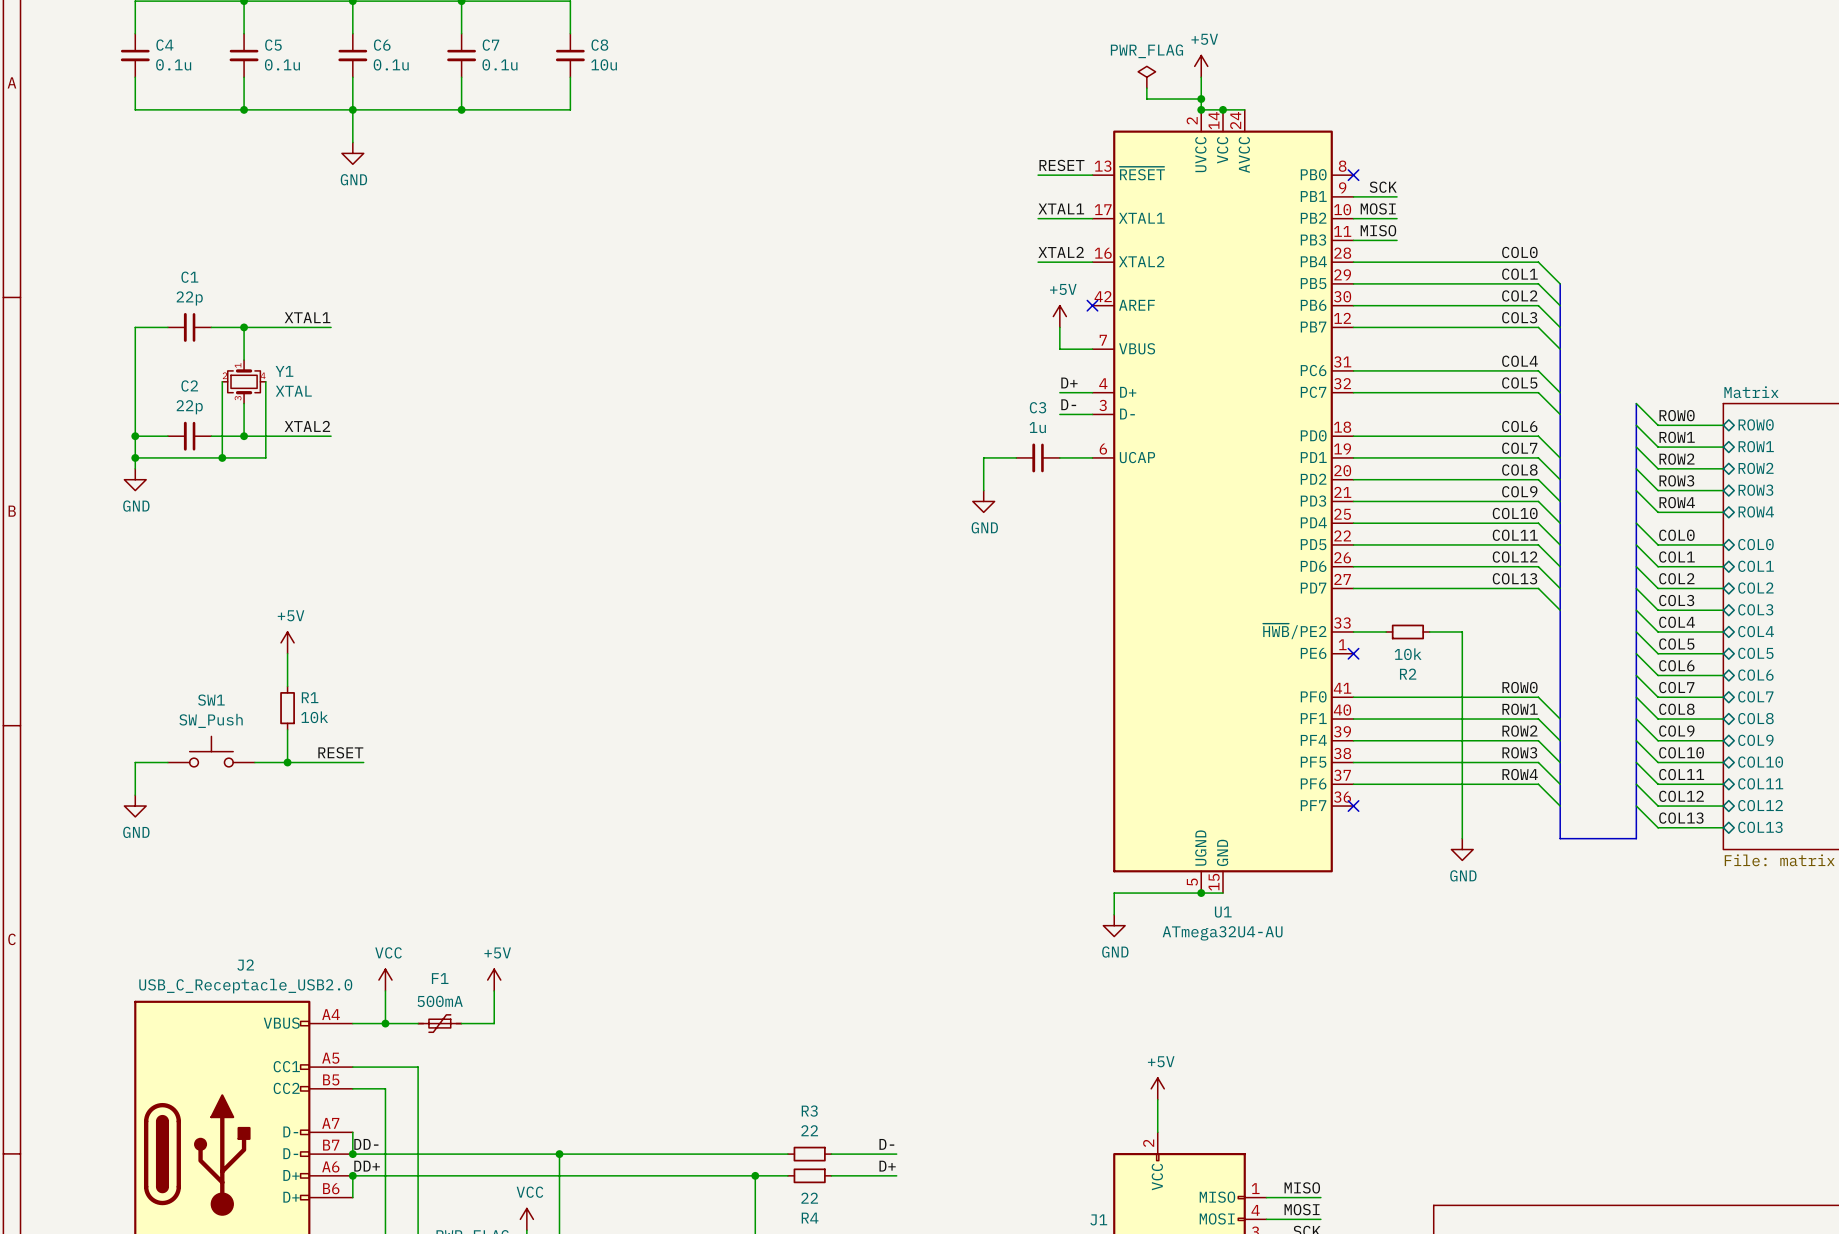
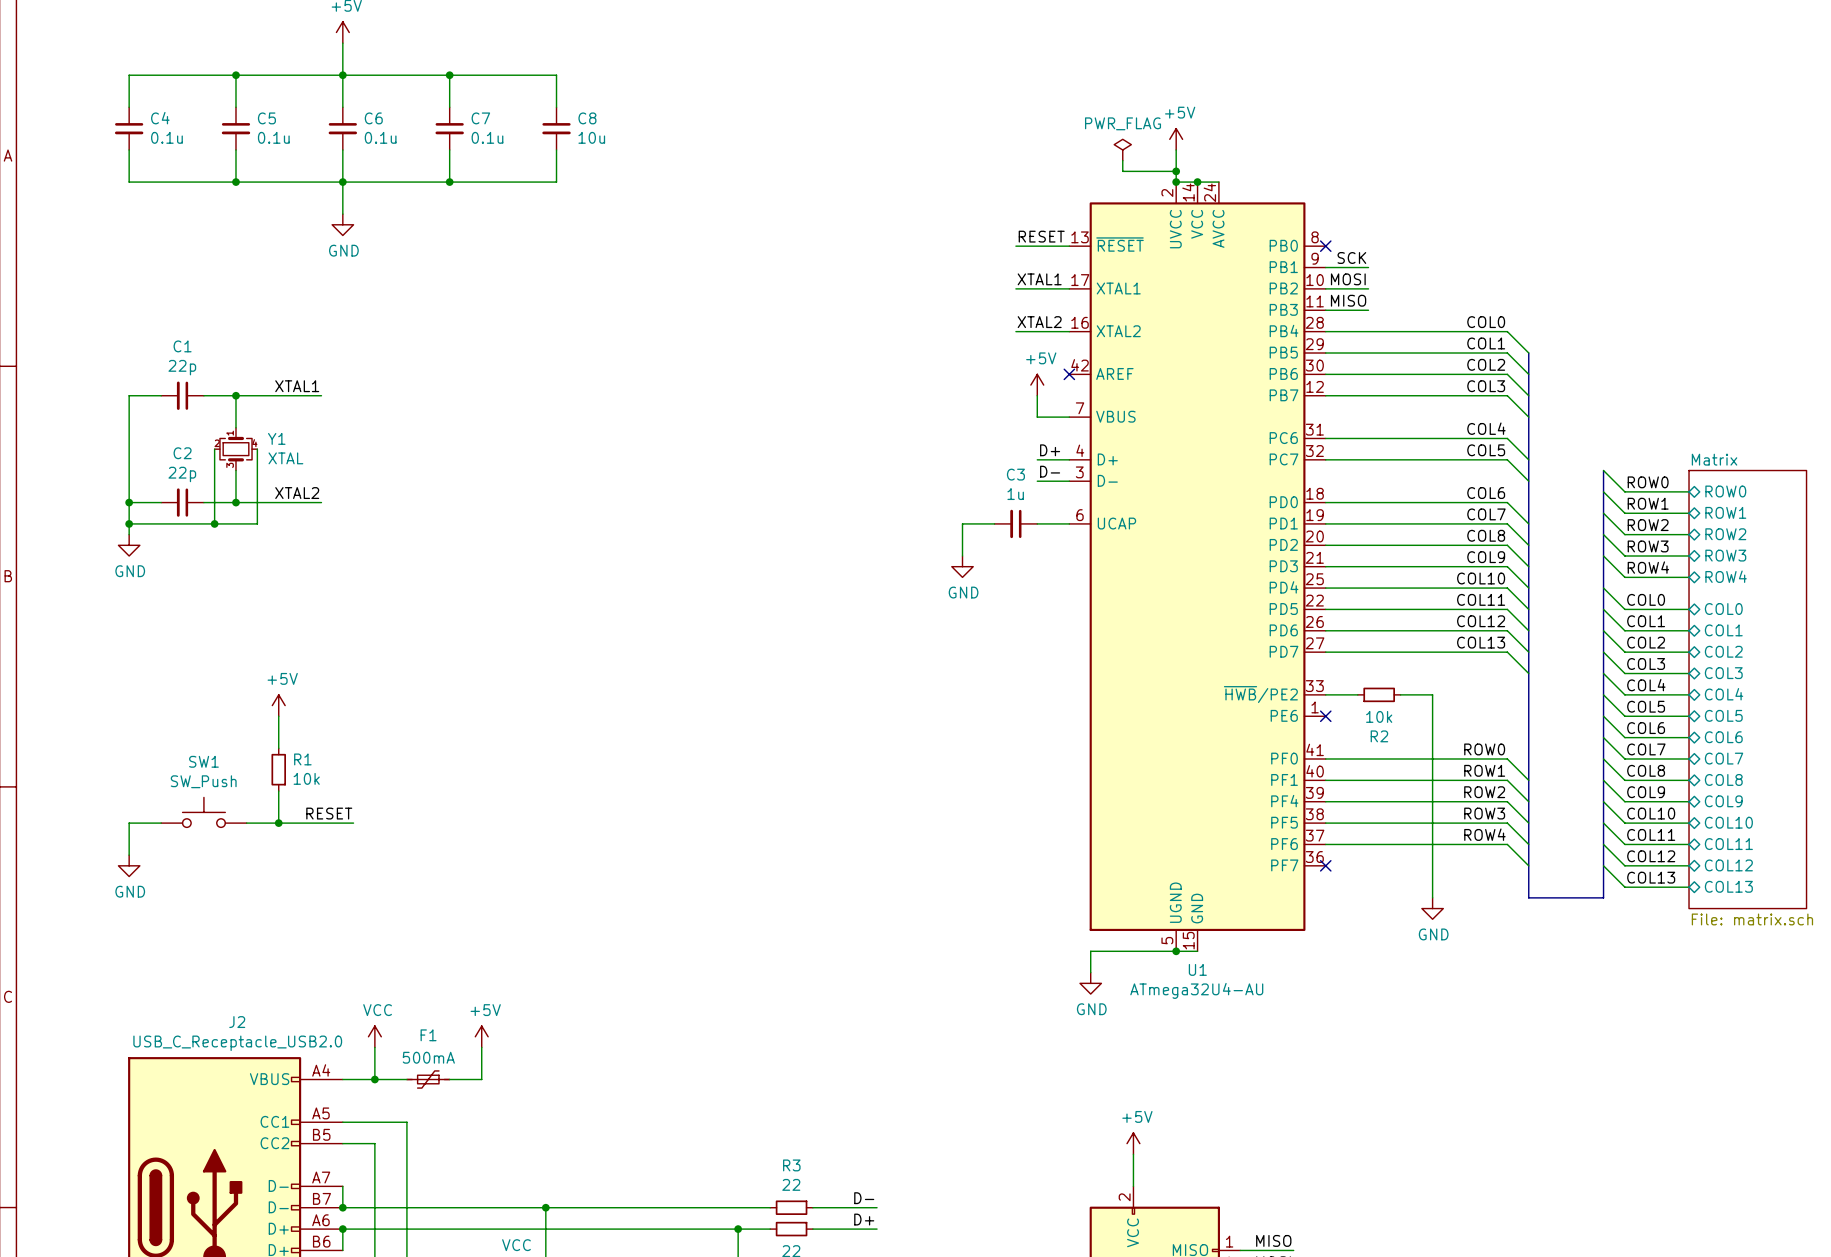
label: DD- (366, 1144) -> none
label: DD+ (367, 1166) -> none

